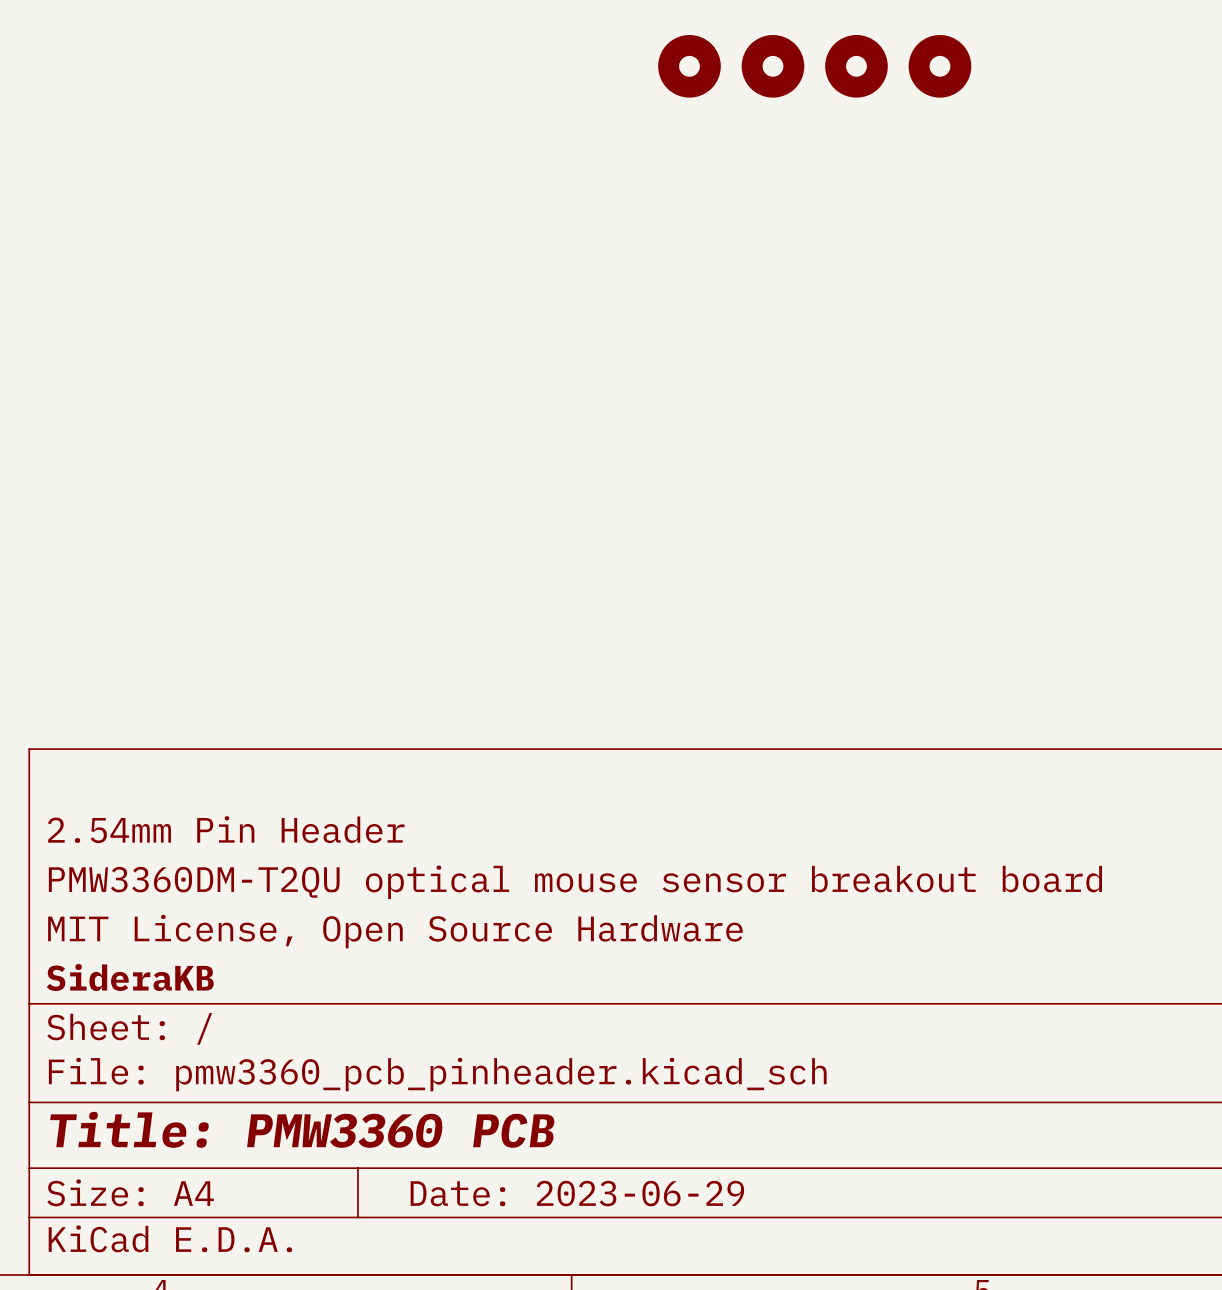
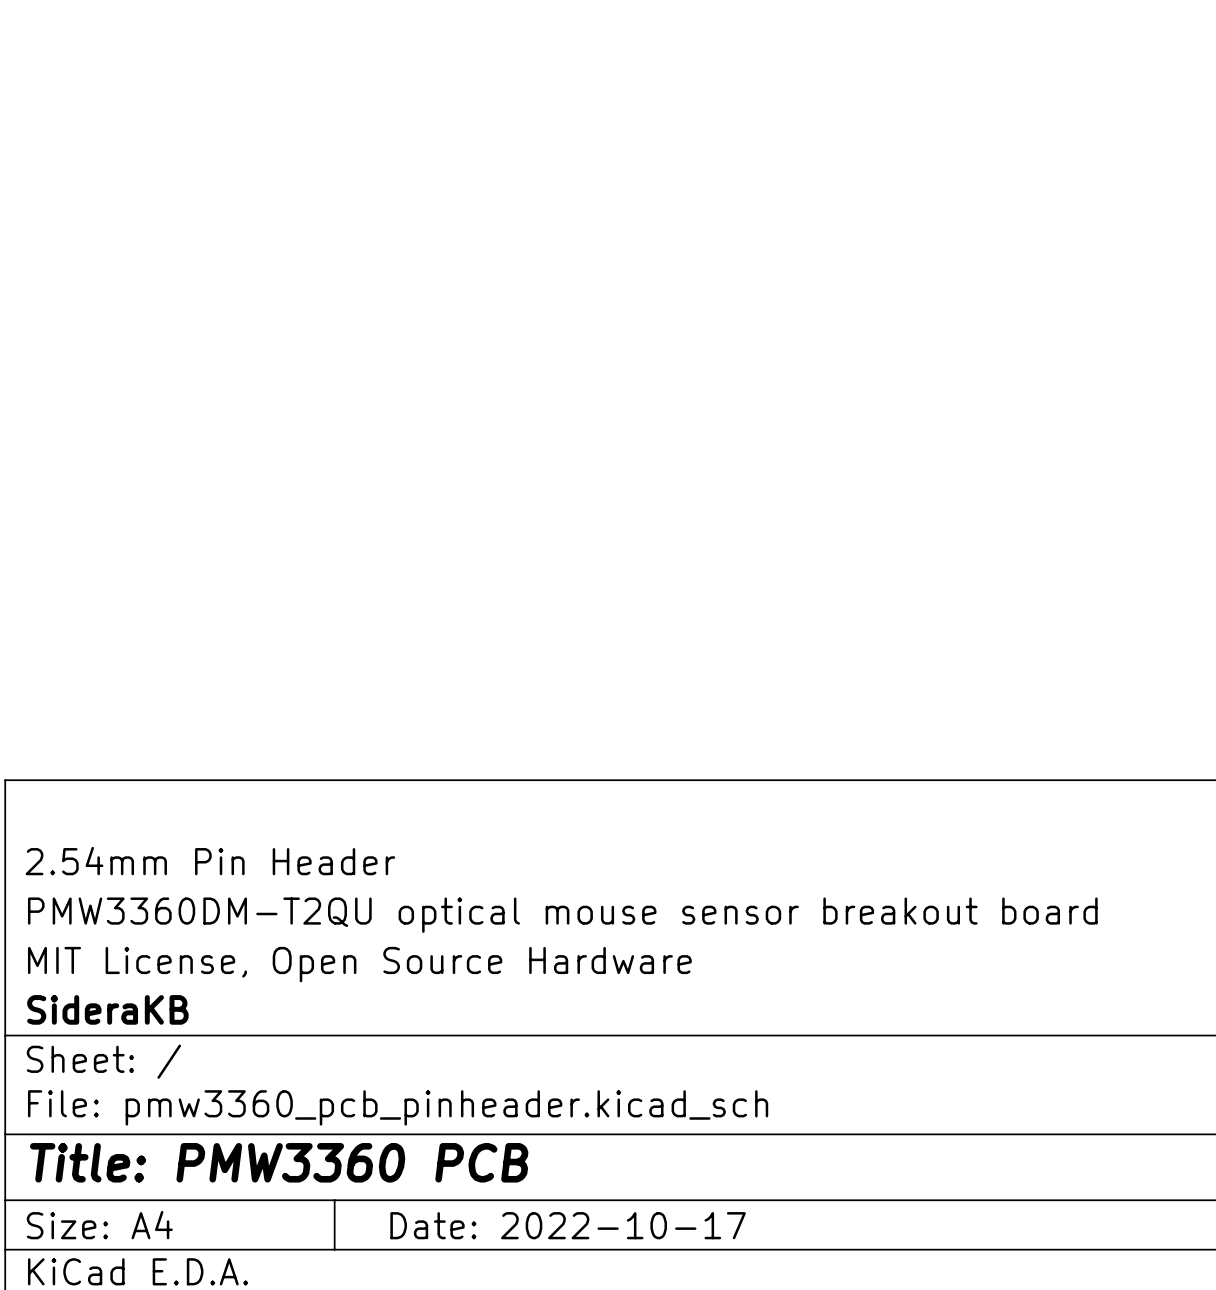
part: (689, 66) -> none
part: (772, 66) -> none
part: (856, 66) -> none
part: (939, 66) -> none
title block: Date: 2023-06-29 (577, 1193) -> Date: 2022-10-17 (568, 1225)

